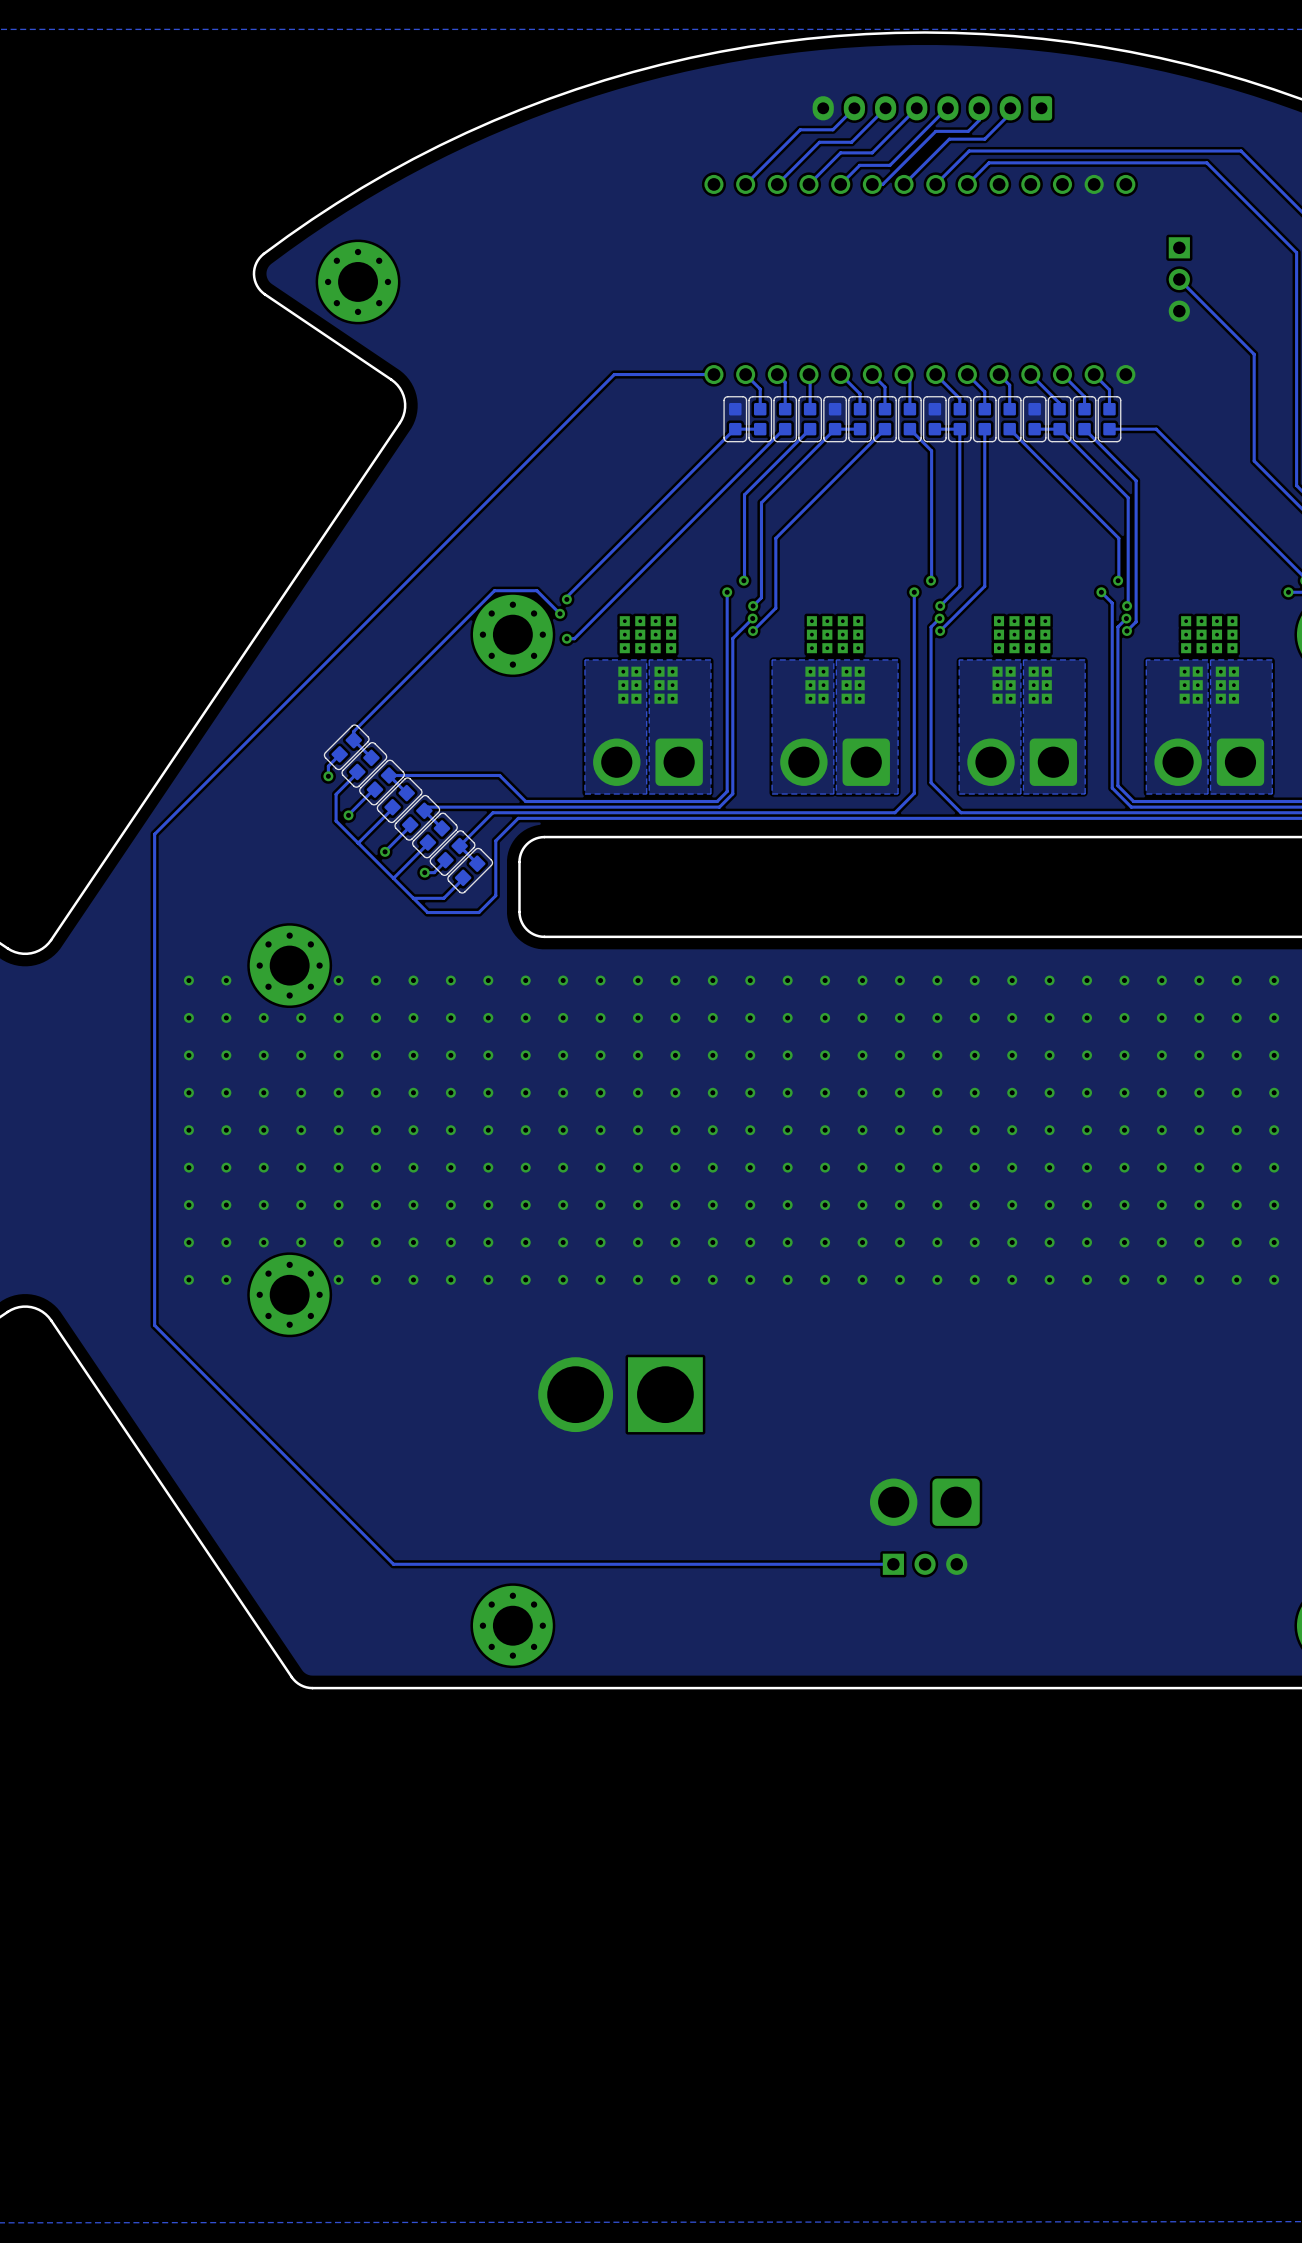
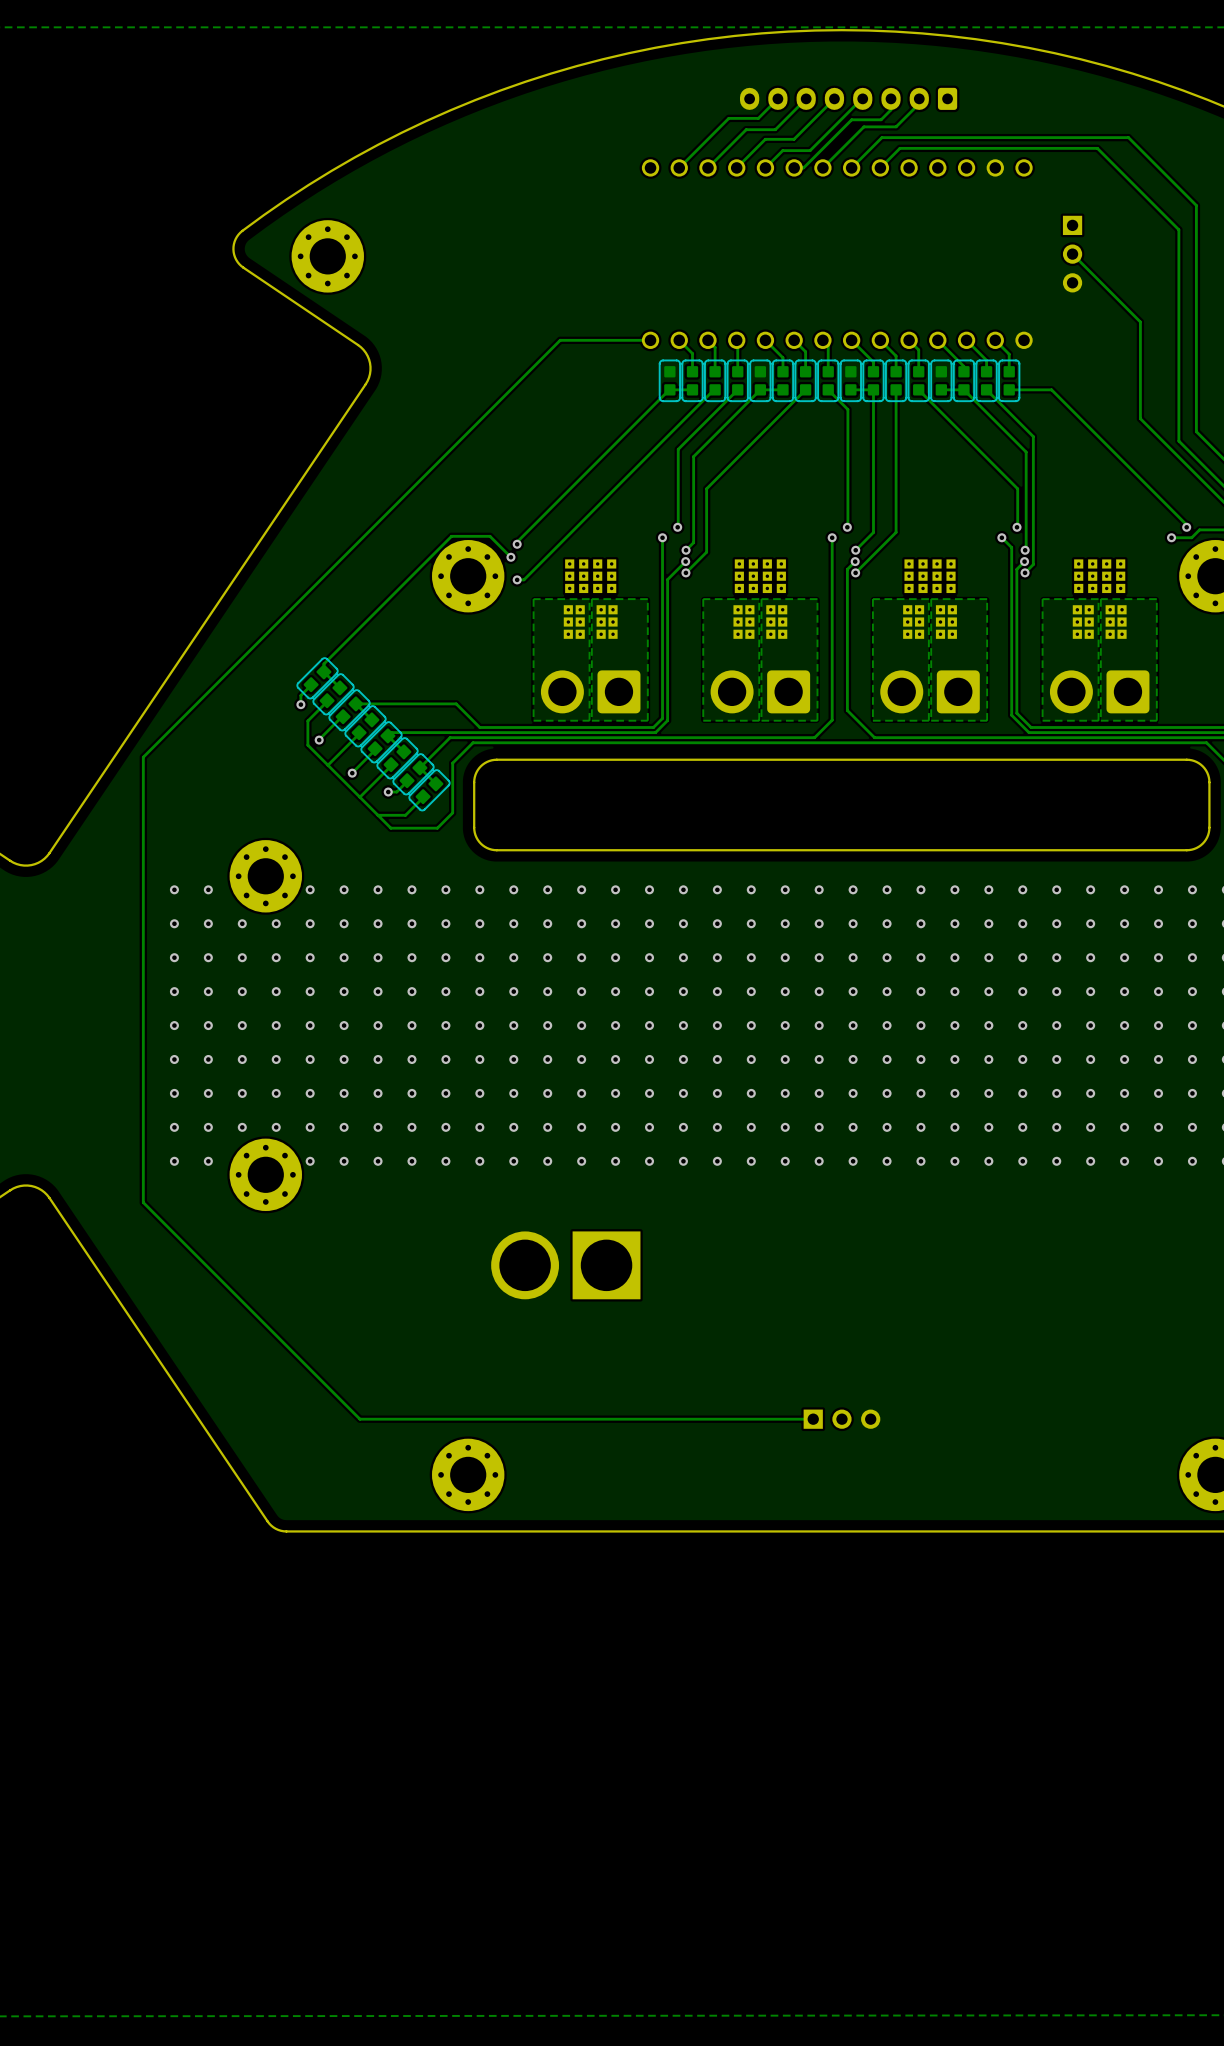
part: (924, 1502) -> none

